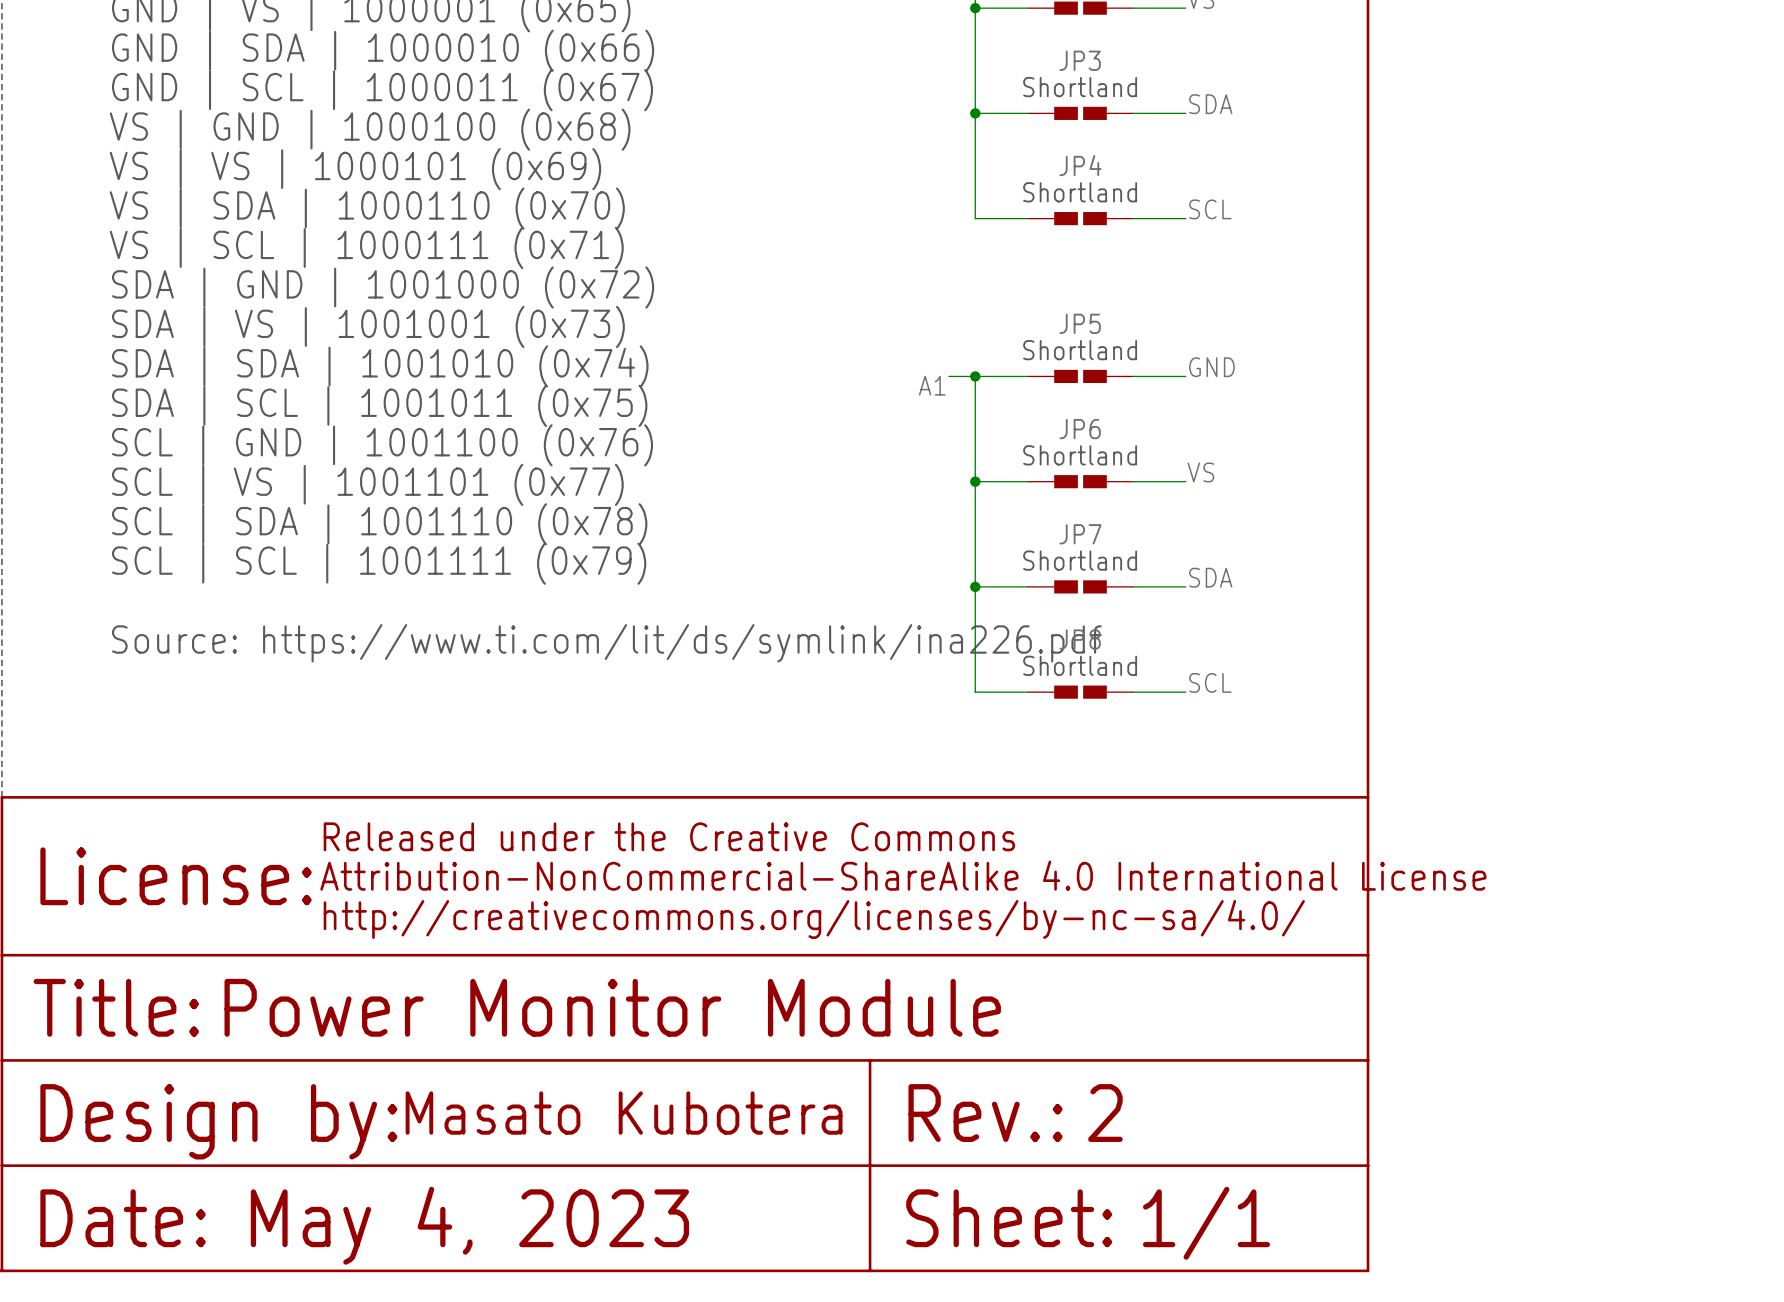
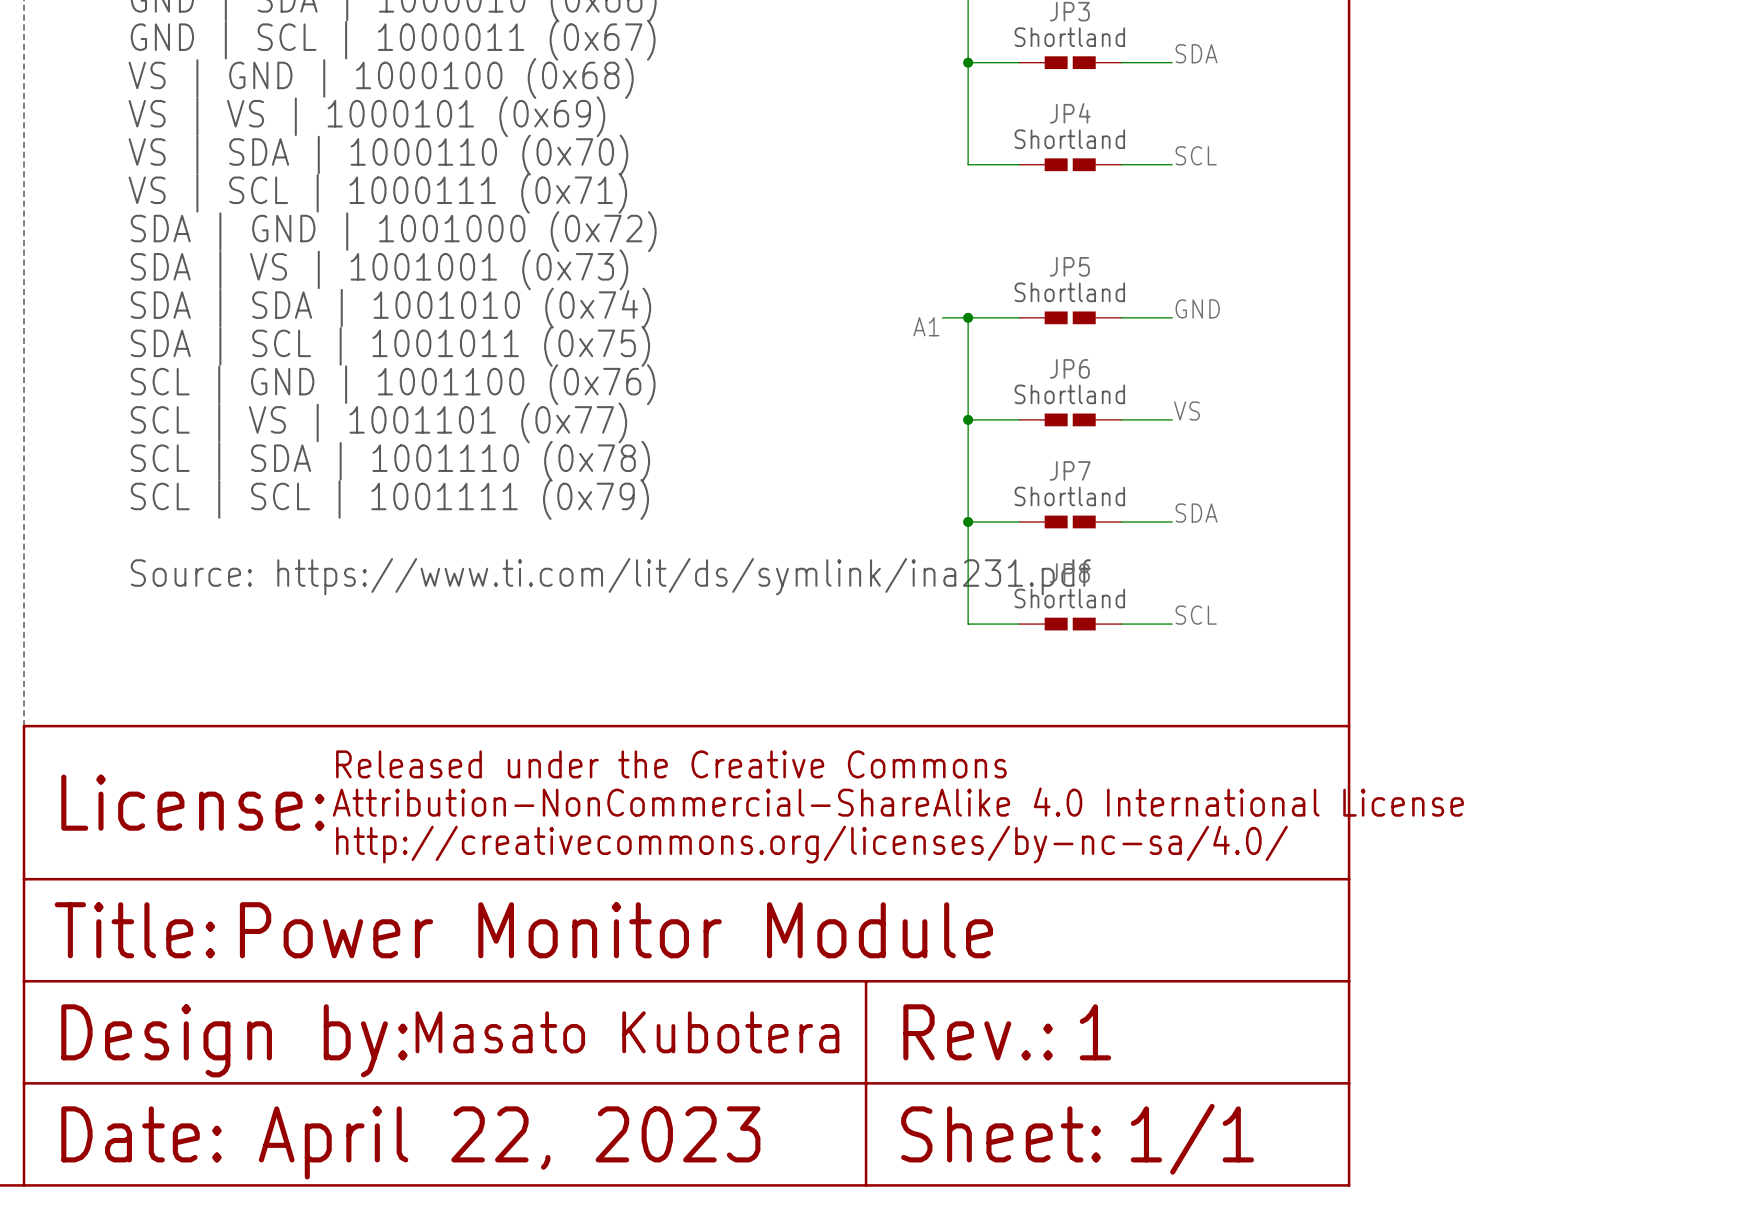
text: Source: https://www.ti.com/lit/ds/symlink/ina226.pdf (606, 643) -> Source: https://www.ti.com/lit/ds/symlink/ina231.pdf (610, 576)
text: 2 (1105, 1113) -> 1 (1095, 1032)
text: May 4, 2023 (469, 1225) -> April 22, 2023 (509, 1142)

